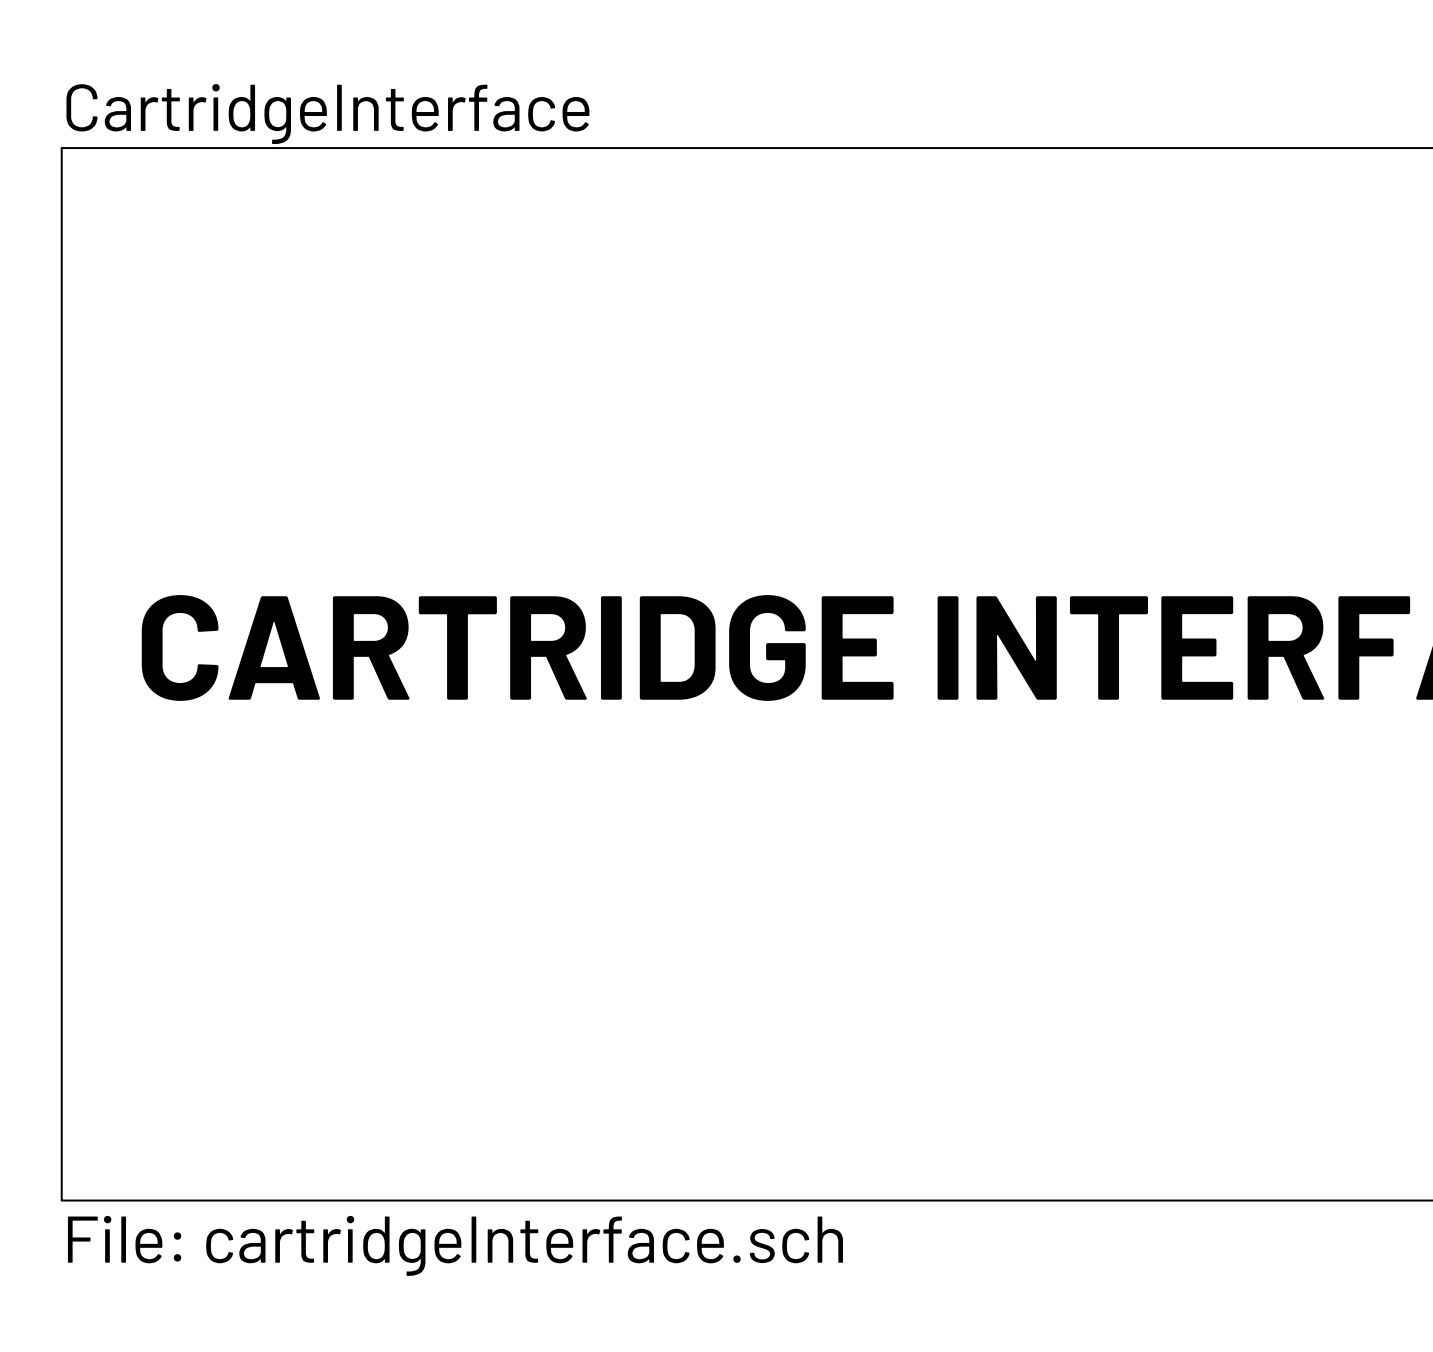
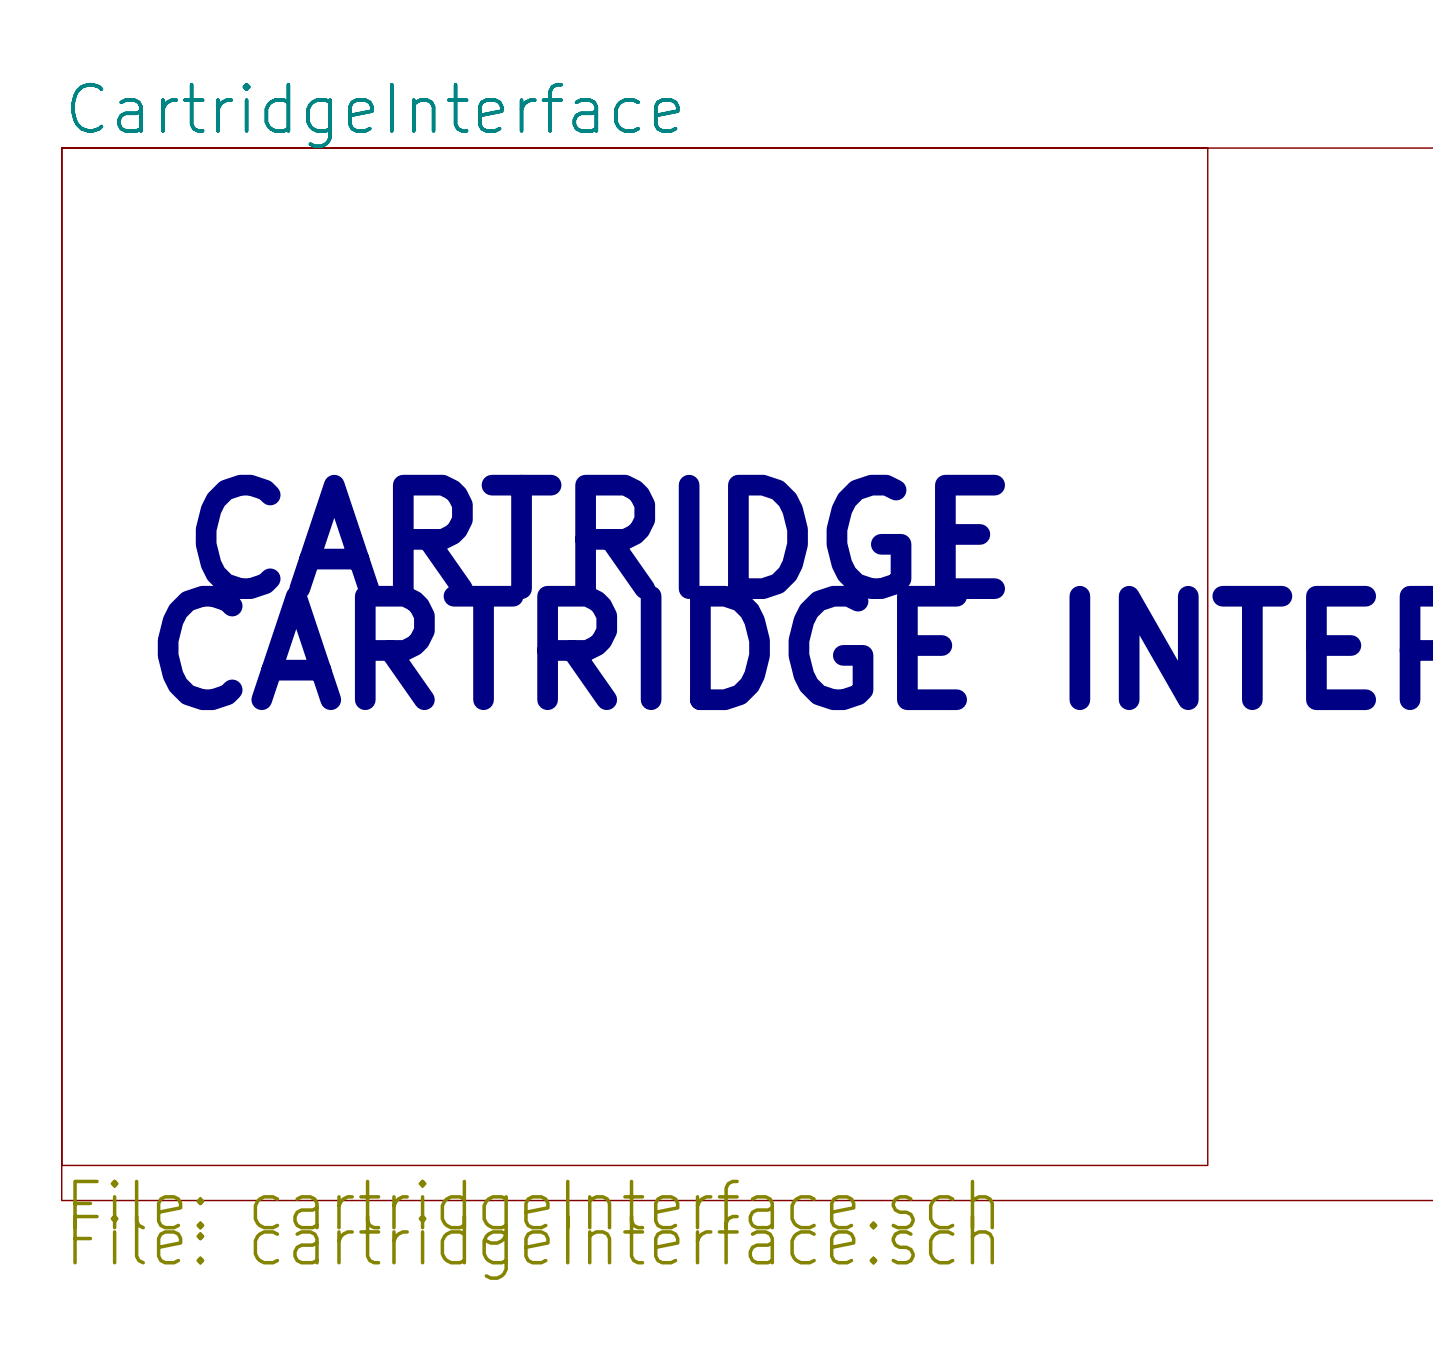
text: none -> CARTRIDGE (600, 536)
sheet CartridgeInterface: none -> File: cartridgeInterface.sch (634, 656)

